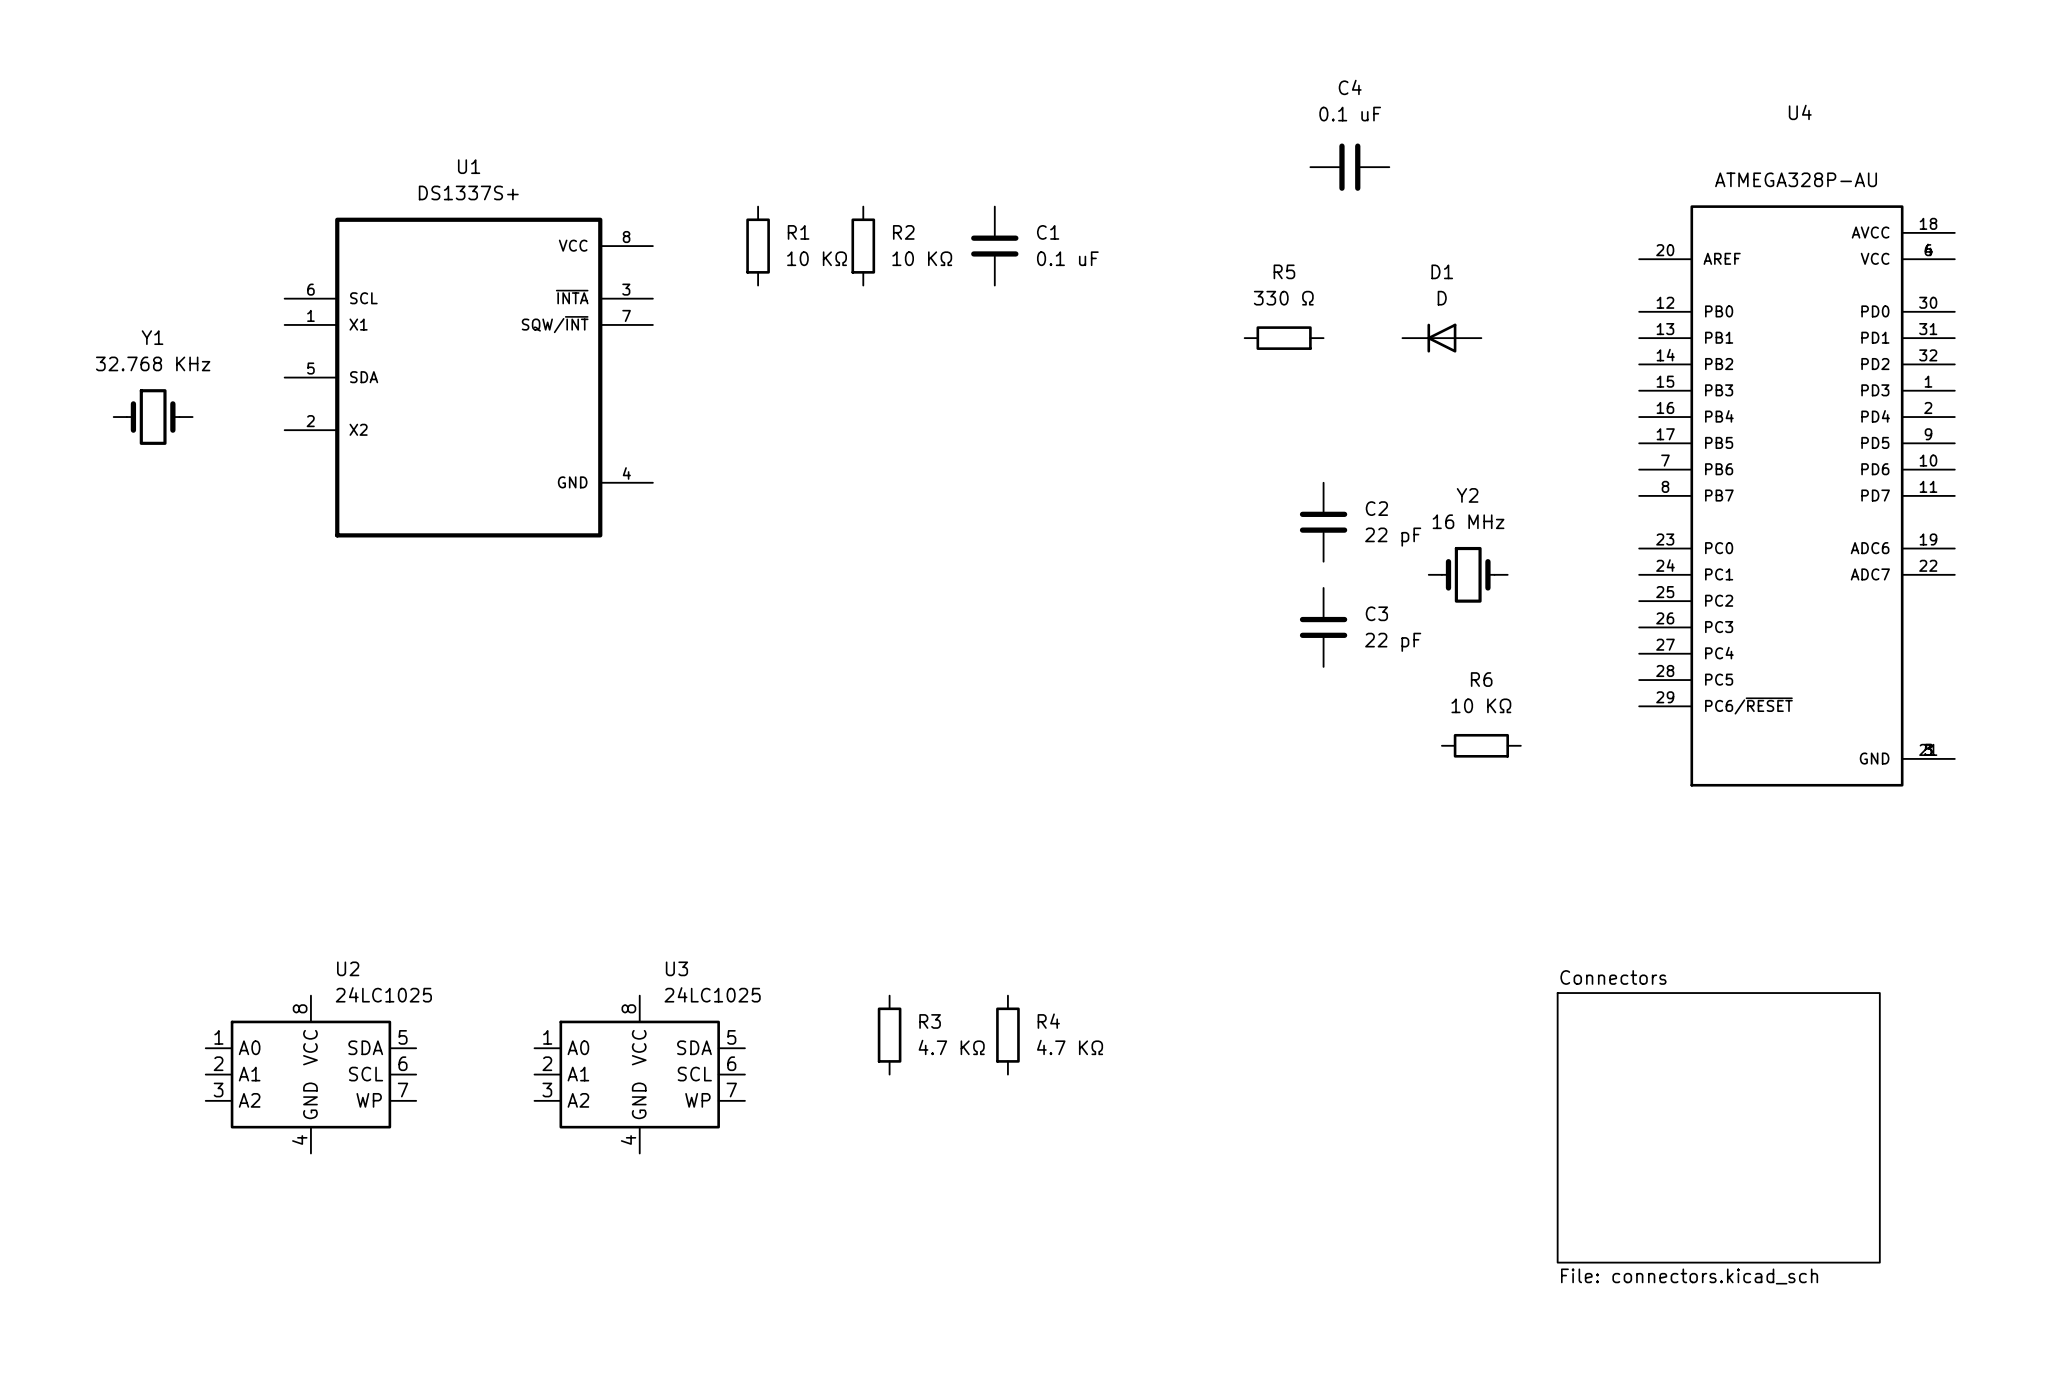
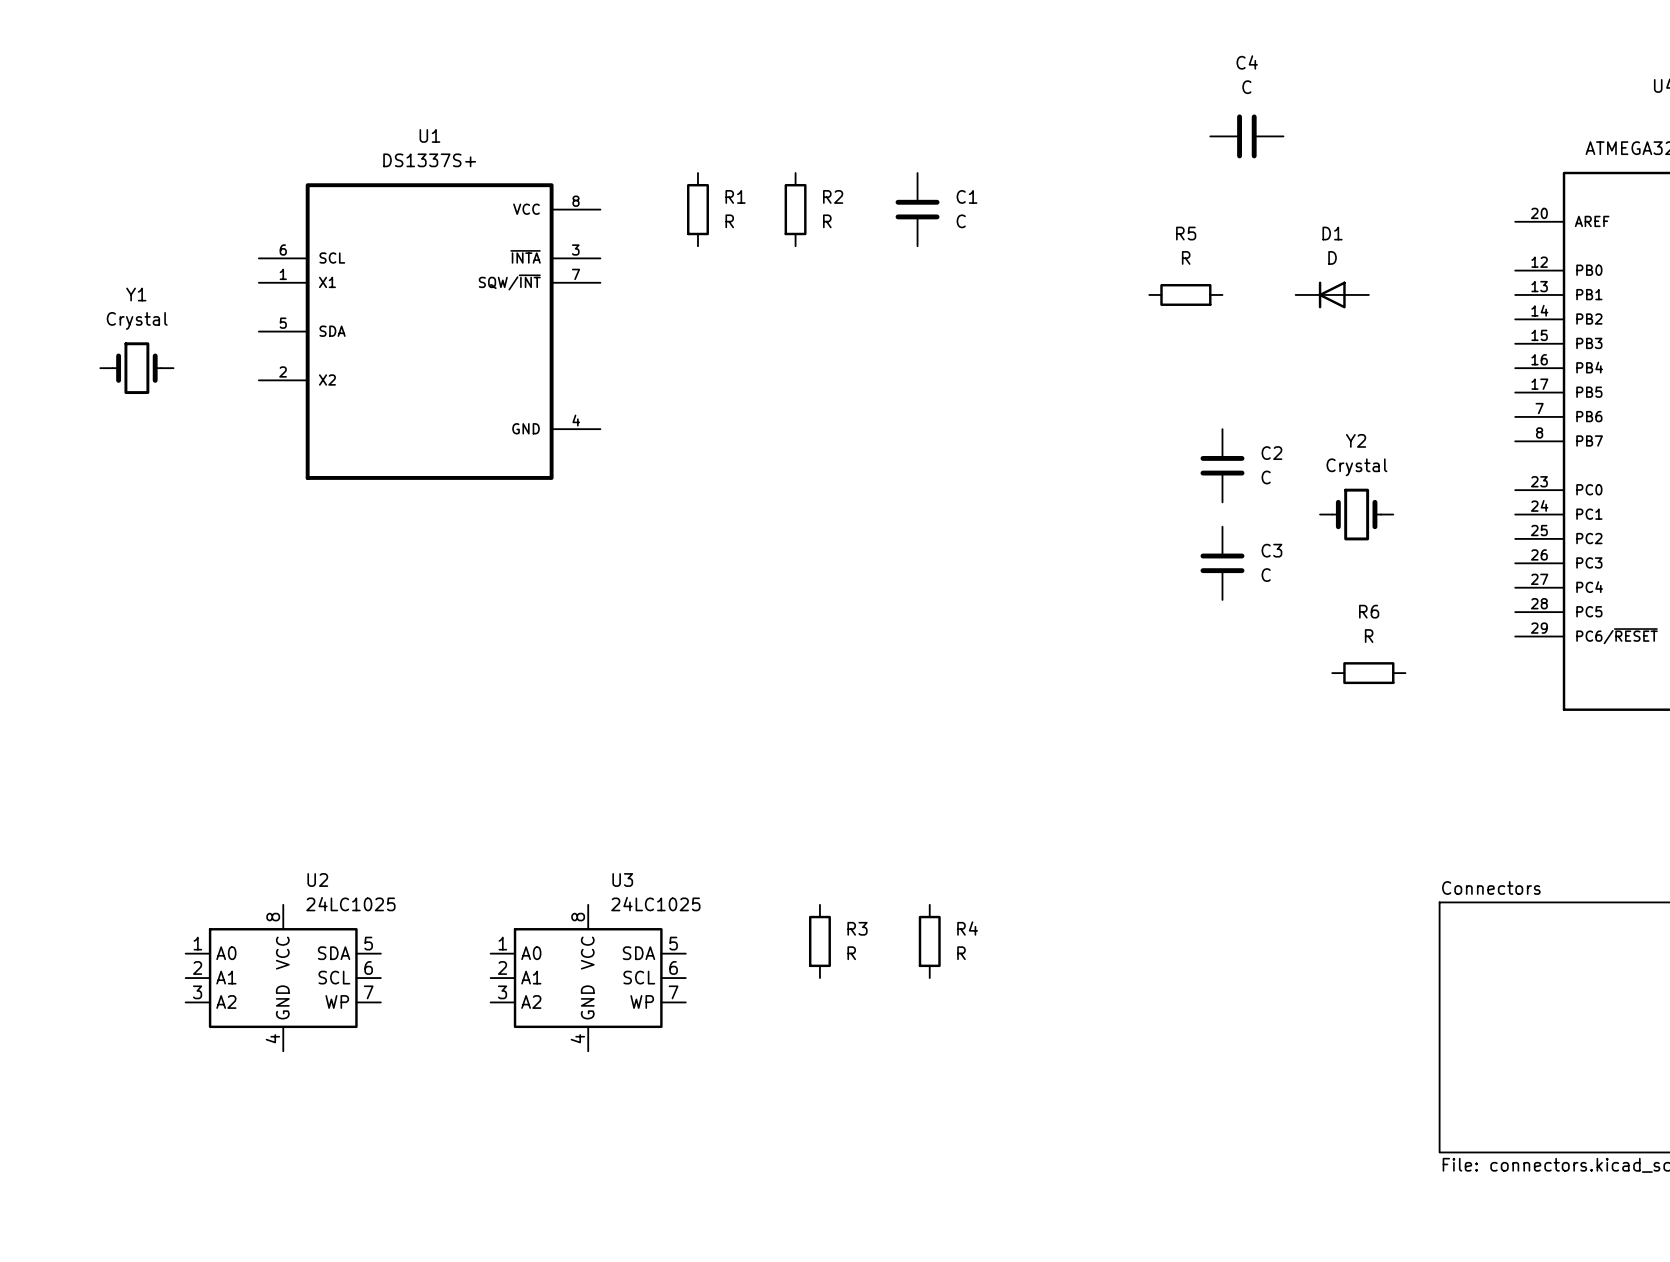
C4 value: 0.1 uF (1350, 114) -> C (1246, 87)
R1 value: 10 ΚΩ (817, 258) -> R (729, 221)
R2 value: 10 ΚΩ (922, 258) -> R (827, 221)
C1 value: 0.1 uF (1067, 258) -> C (961, 221)
R5 value: 330 Ω (1283, 298) -> R (1186, 257)
Y1 value: 32.768 KHz (153, 363) -> Crystal (137, 320)
Y2 value: 16 MHz (1468, 521) -> Crystal (1356, 467)
C2 value: 22 pF (1393, 537) -> C (1266, 477)
C3 value: 22 pF (1393, 642) -> C (1266, 575)
R6 value: 10 ΚΩ (1481, 705) -> R (1369, 636)
R3 value: 4.7 ΚΩ (951, 1047) -> R (851, 953)
R4 value: 4.7 ΚΩ (1070, 1047) -> R (961, 953)

